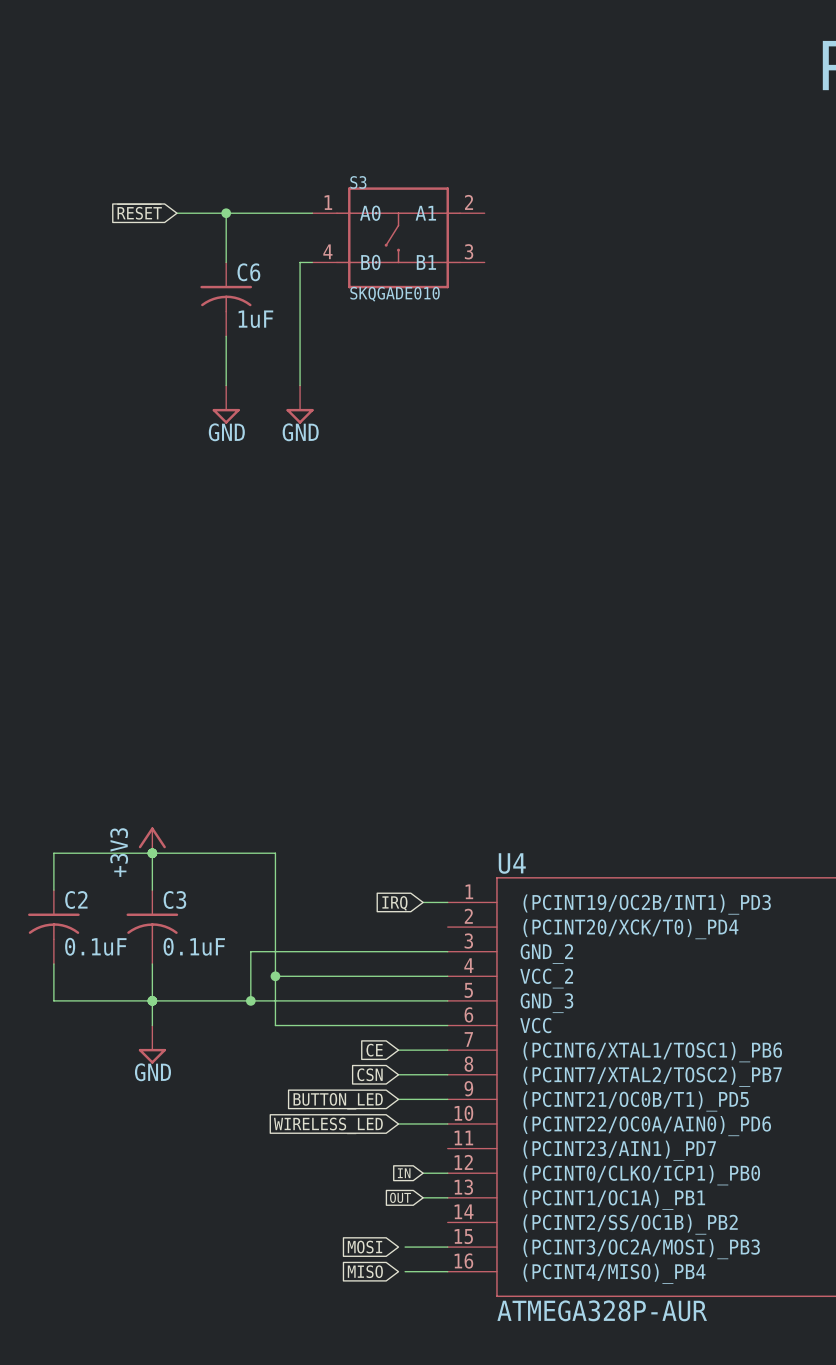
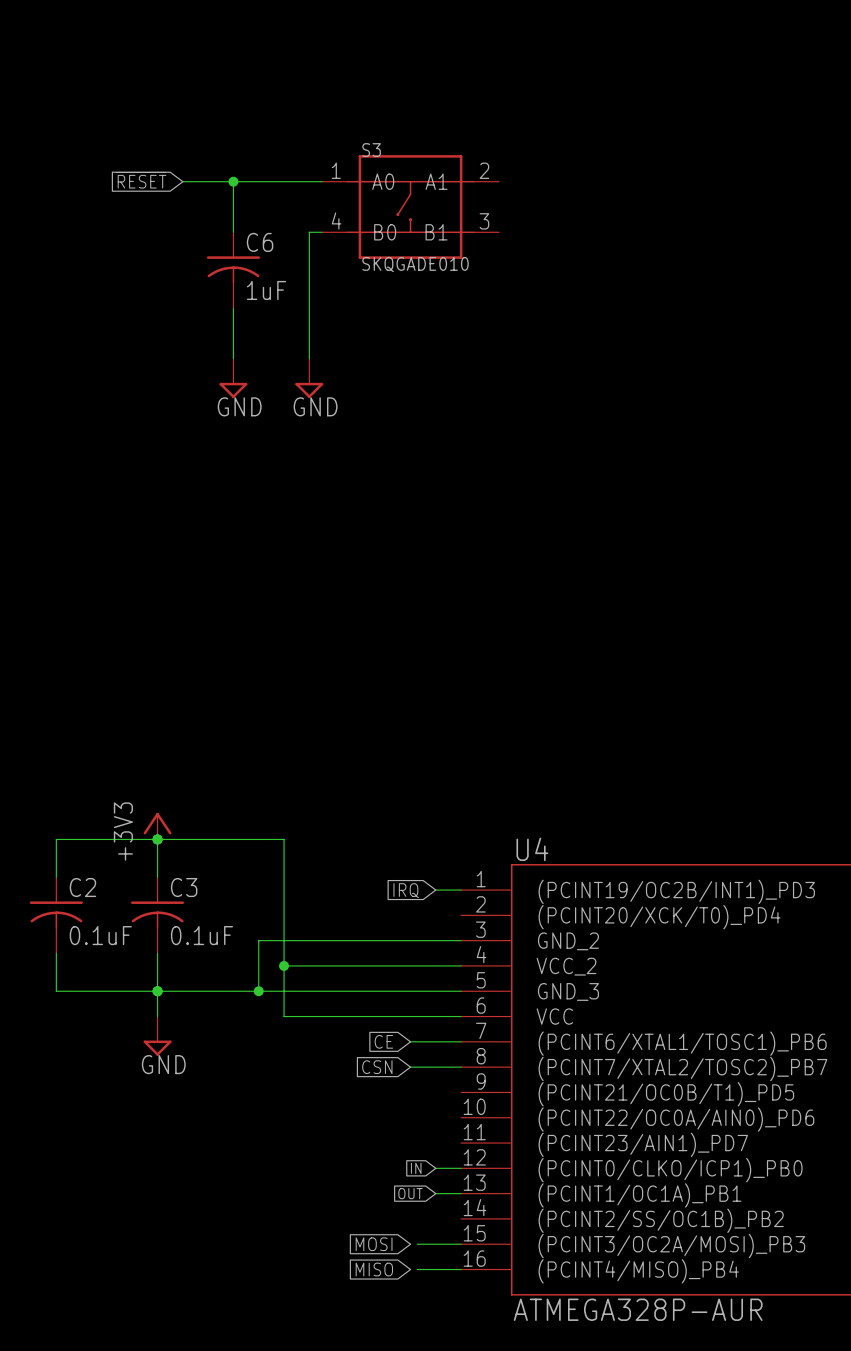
wire: (398, 1099) (447, 1099) -> none
global label: BUTTON_LED (338, 1101) -> none
wire: (398, 1123) (447, 1123) -> none
global label: WIRELESS_LED (328, 1125) -> none

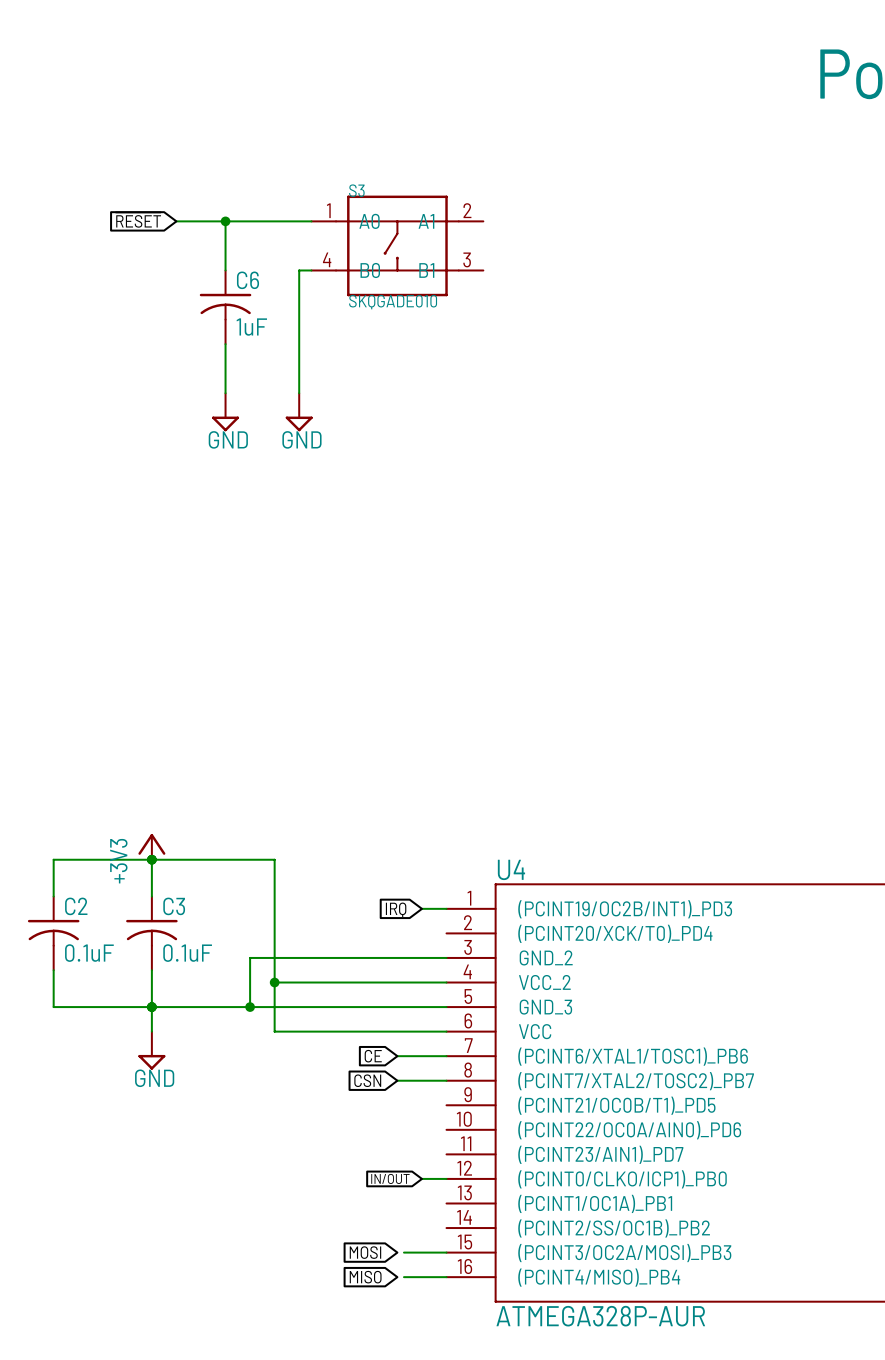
global label: IN (416, 1168) -> IN/OUT (390, 1178)
global label: OUT (410, 1193) -> none
wire: (435, 1193) (461, 1193) -> none

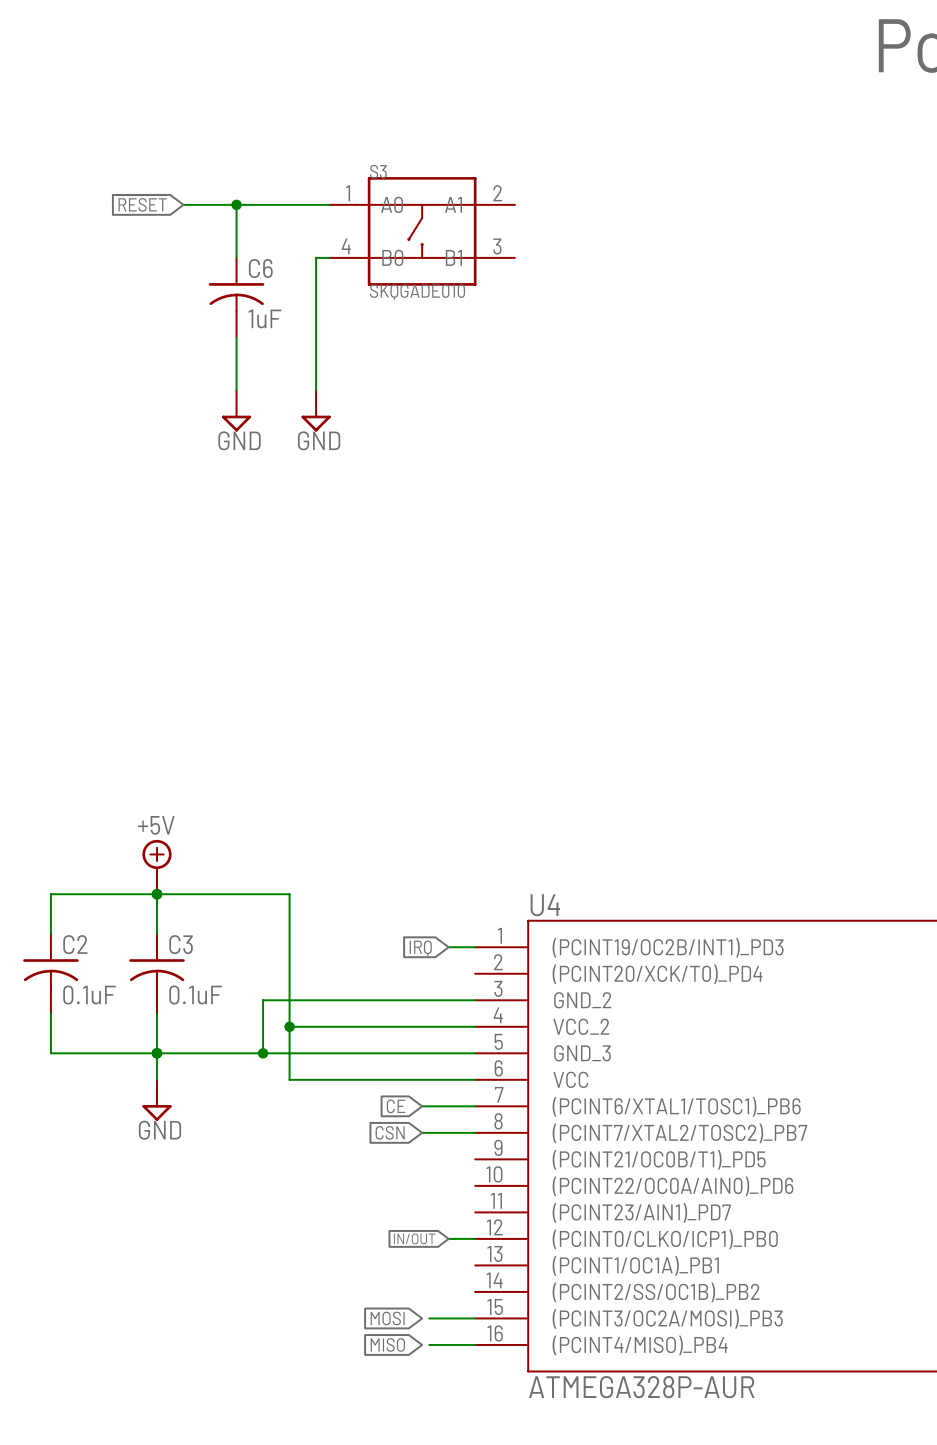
power symbol: none -> +5V (157, 867)
power symbol: +3V3 (151, 846) -> none

